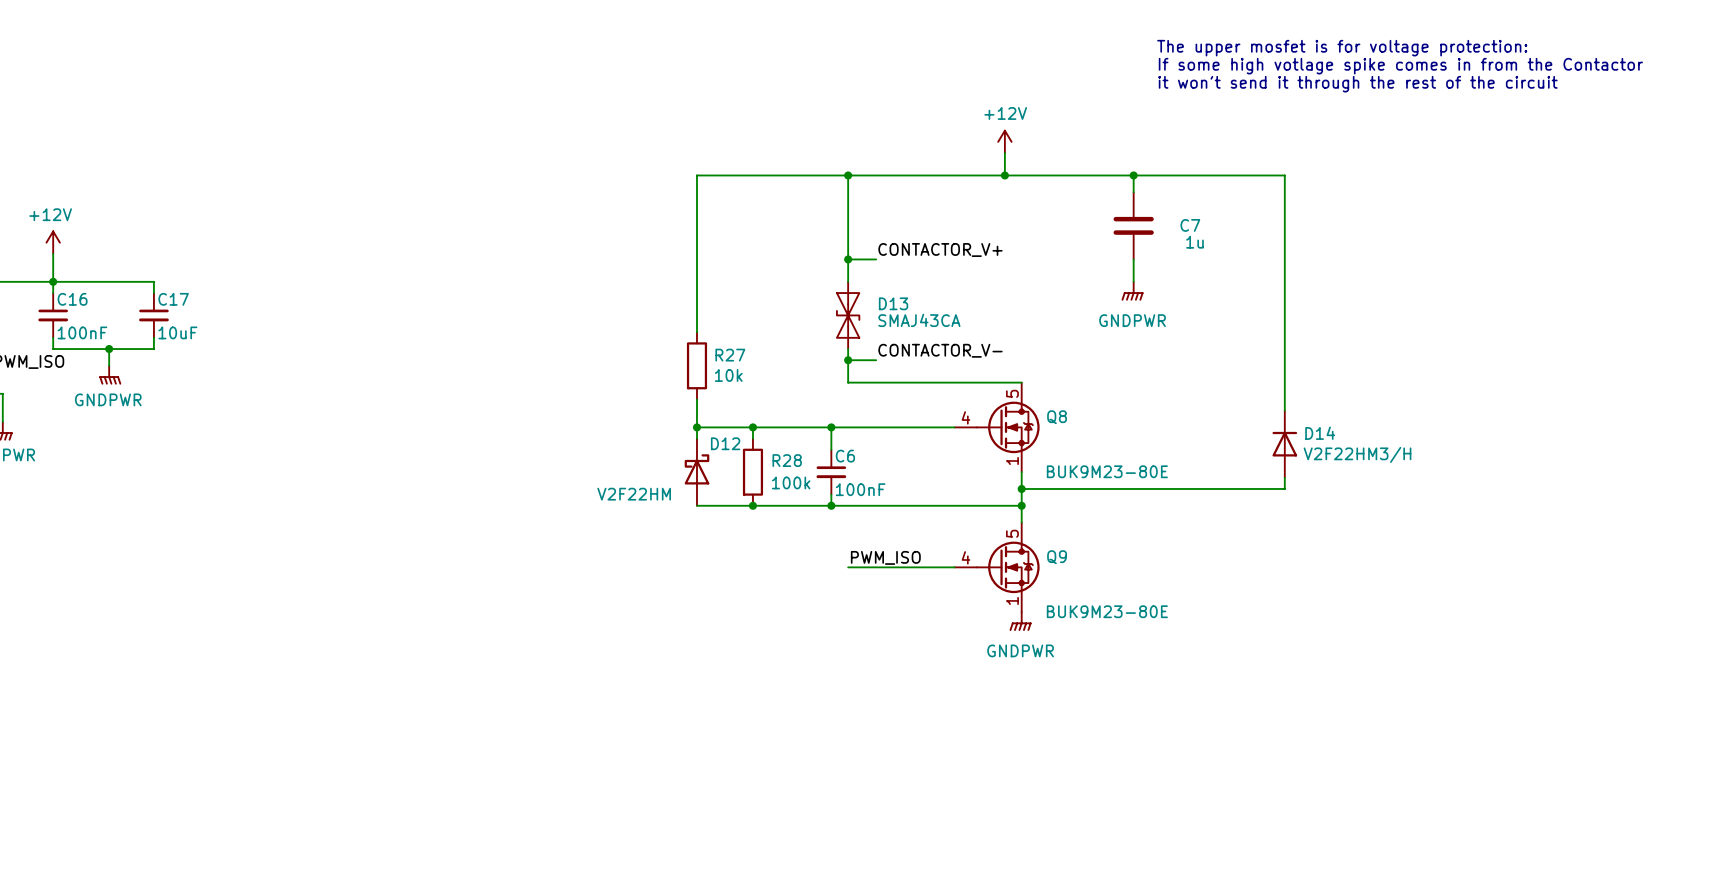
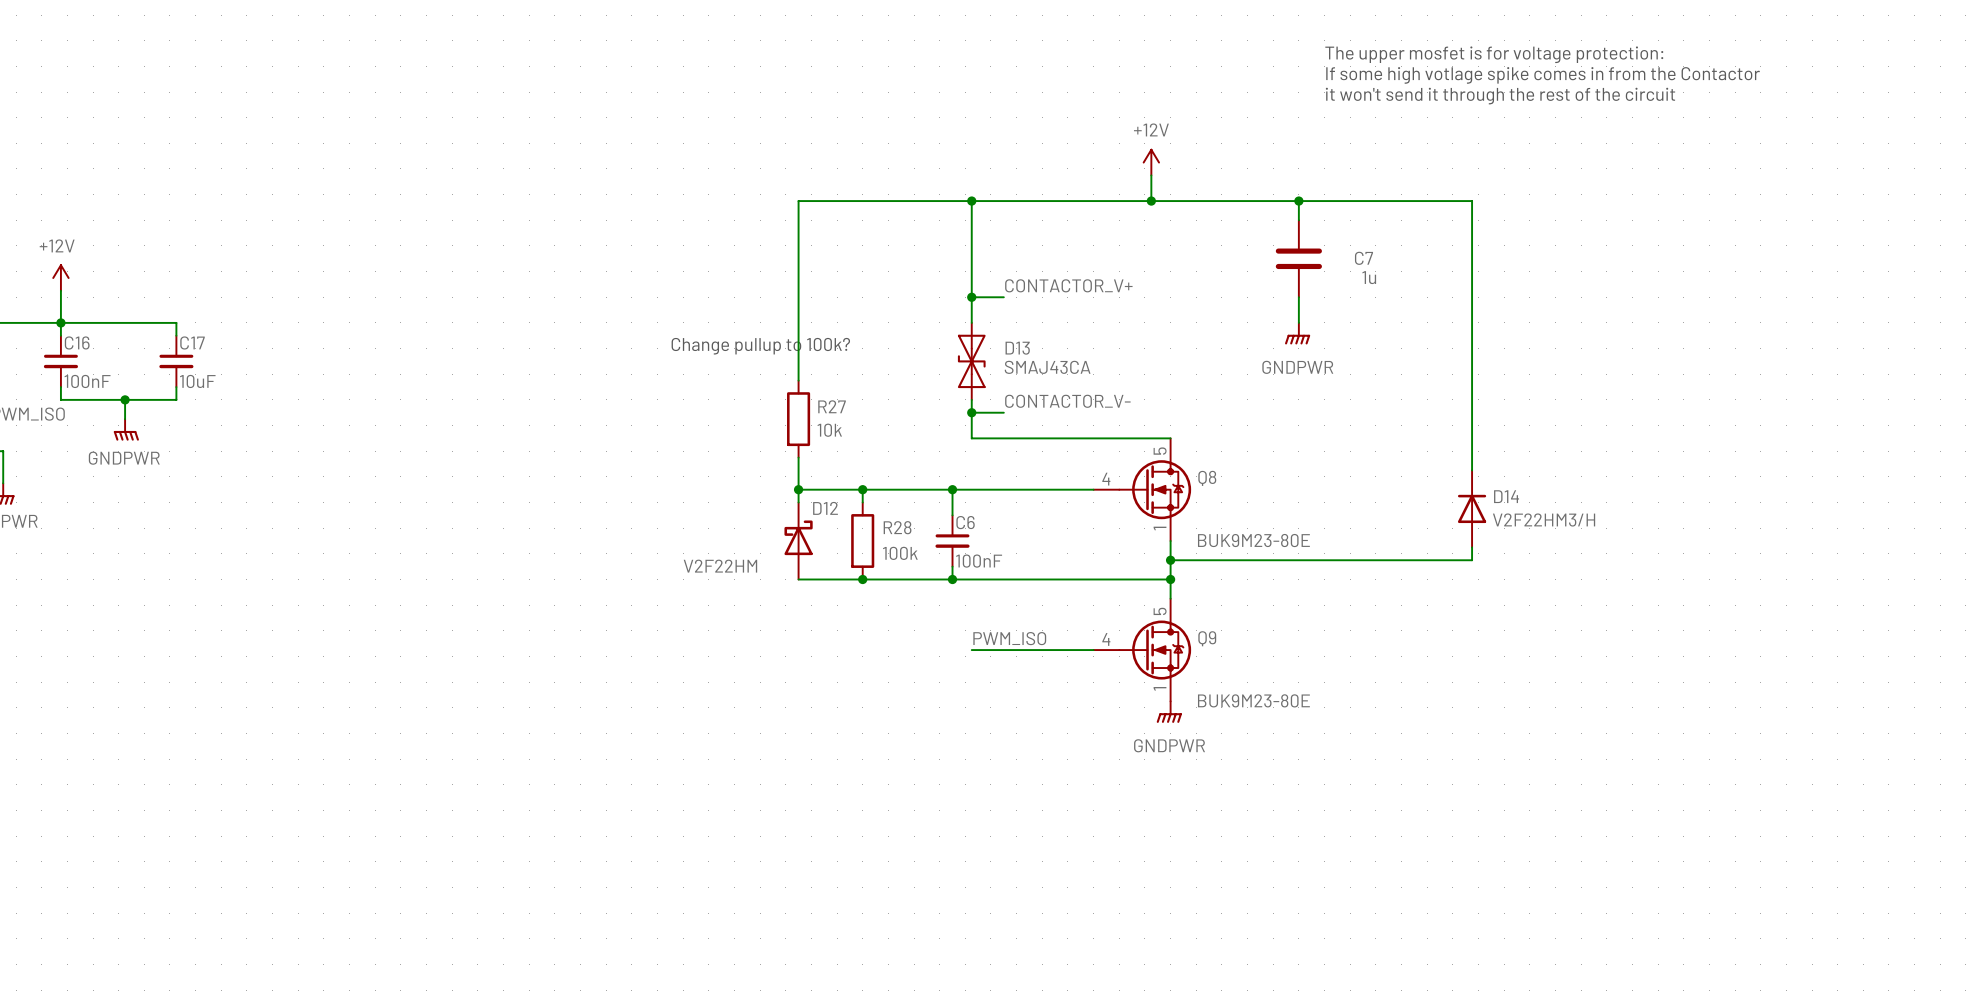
text: none -> Change pullup to 100k? (760, 346)

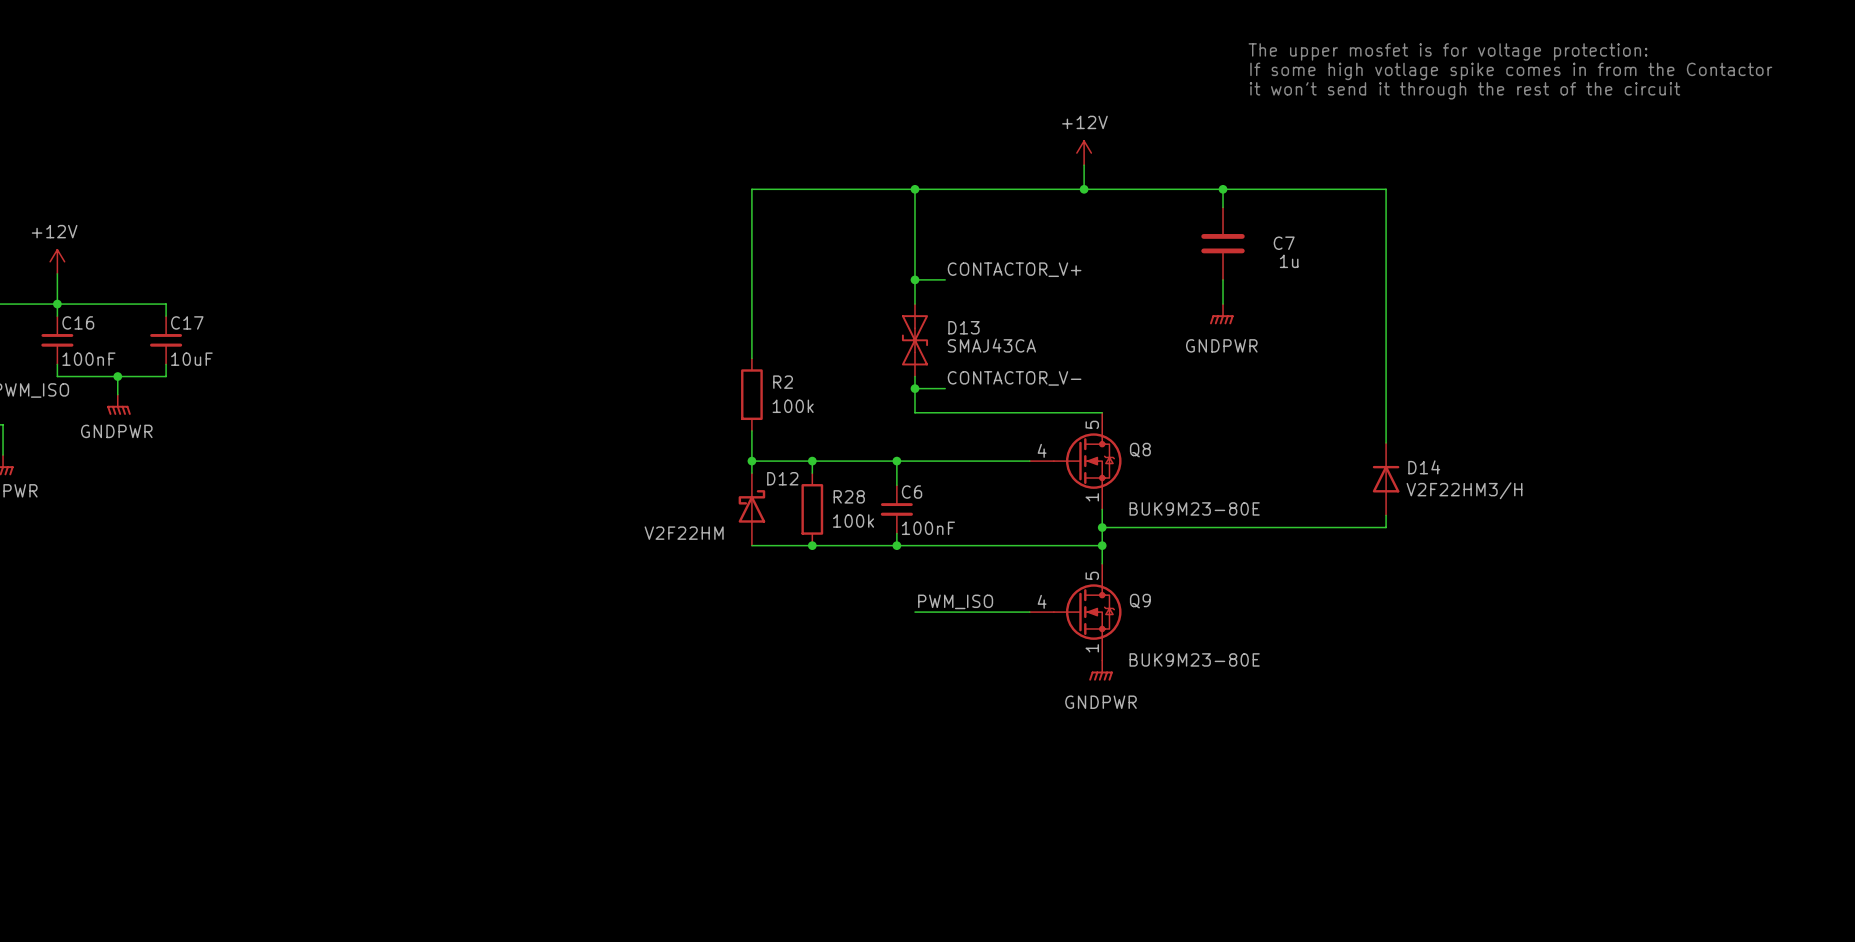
text: Change pullup to 100k? (760, 346) -> none
R27 name: R27 (832, 406) -> R2 (783, 382)
R27 value: 10k (829, 430) -> 100k (793, 406)

